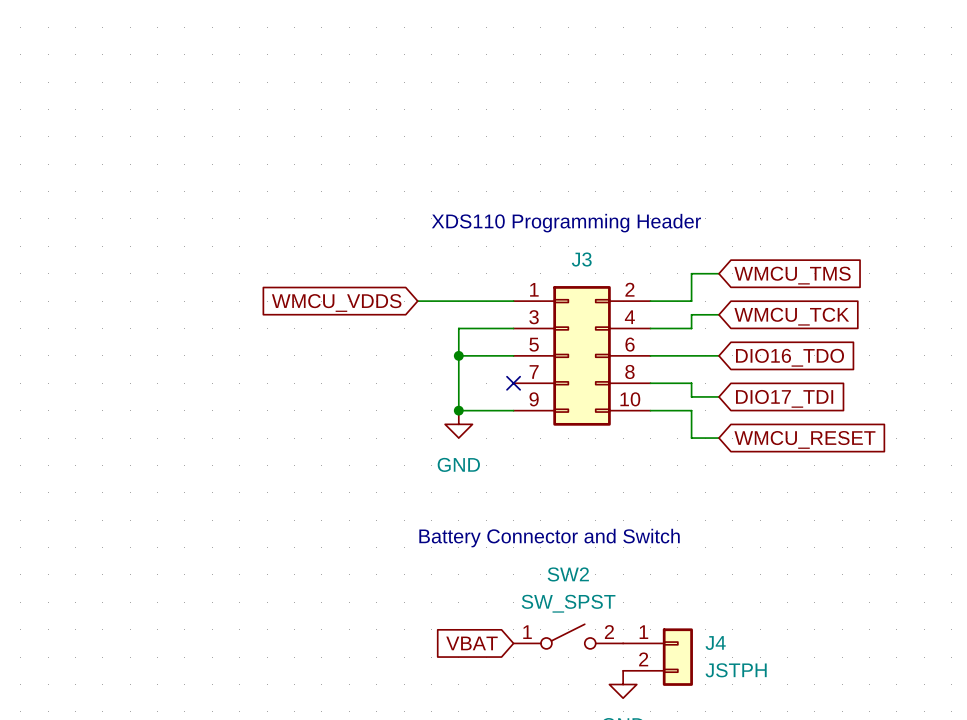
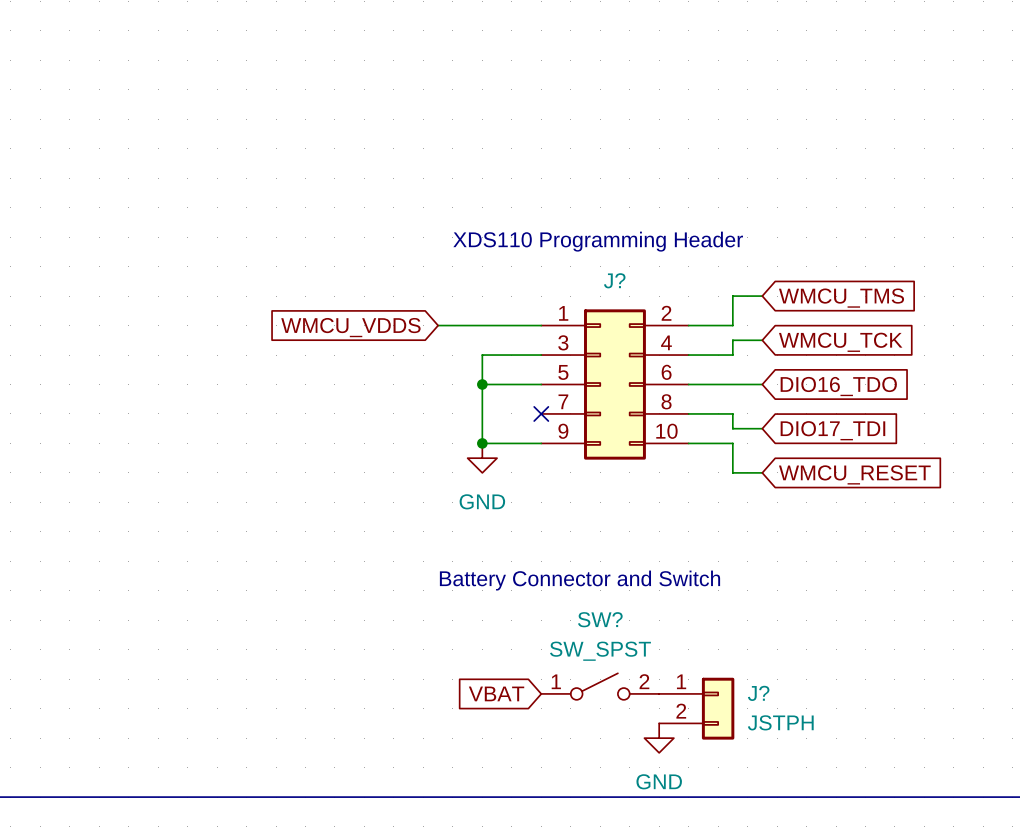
J3 name: J3 (581, 259) -> J? (614, 280)
SW2 name: SW2 (568, 574) -> SW? (600, 619)
J4 name: J4 (715, 643) -> J? (758, 693)

